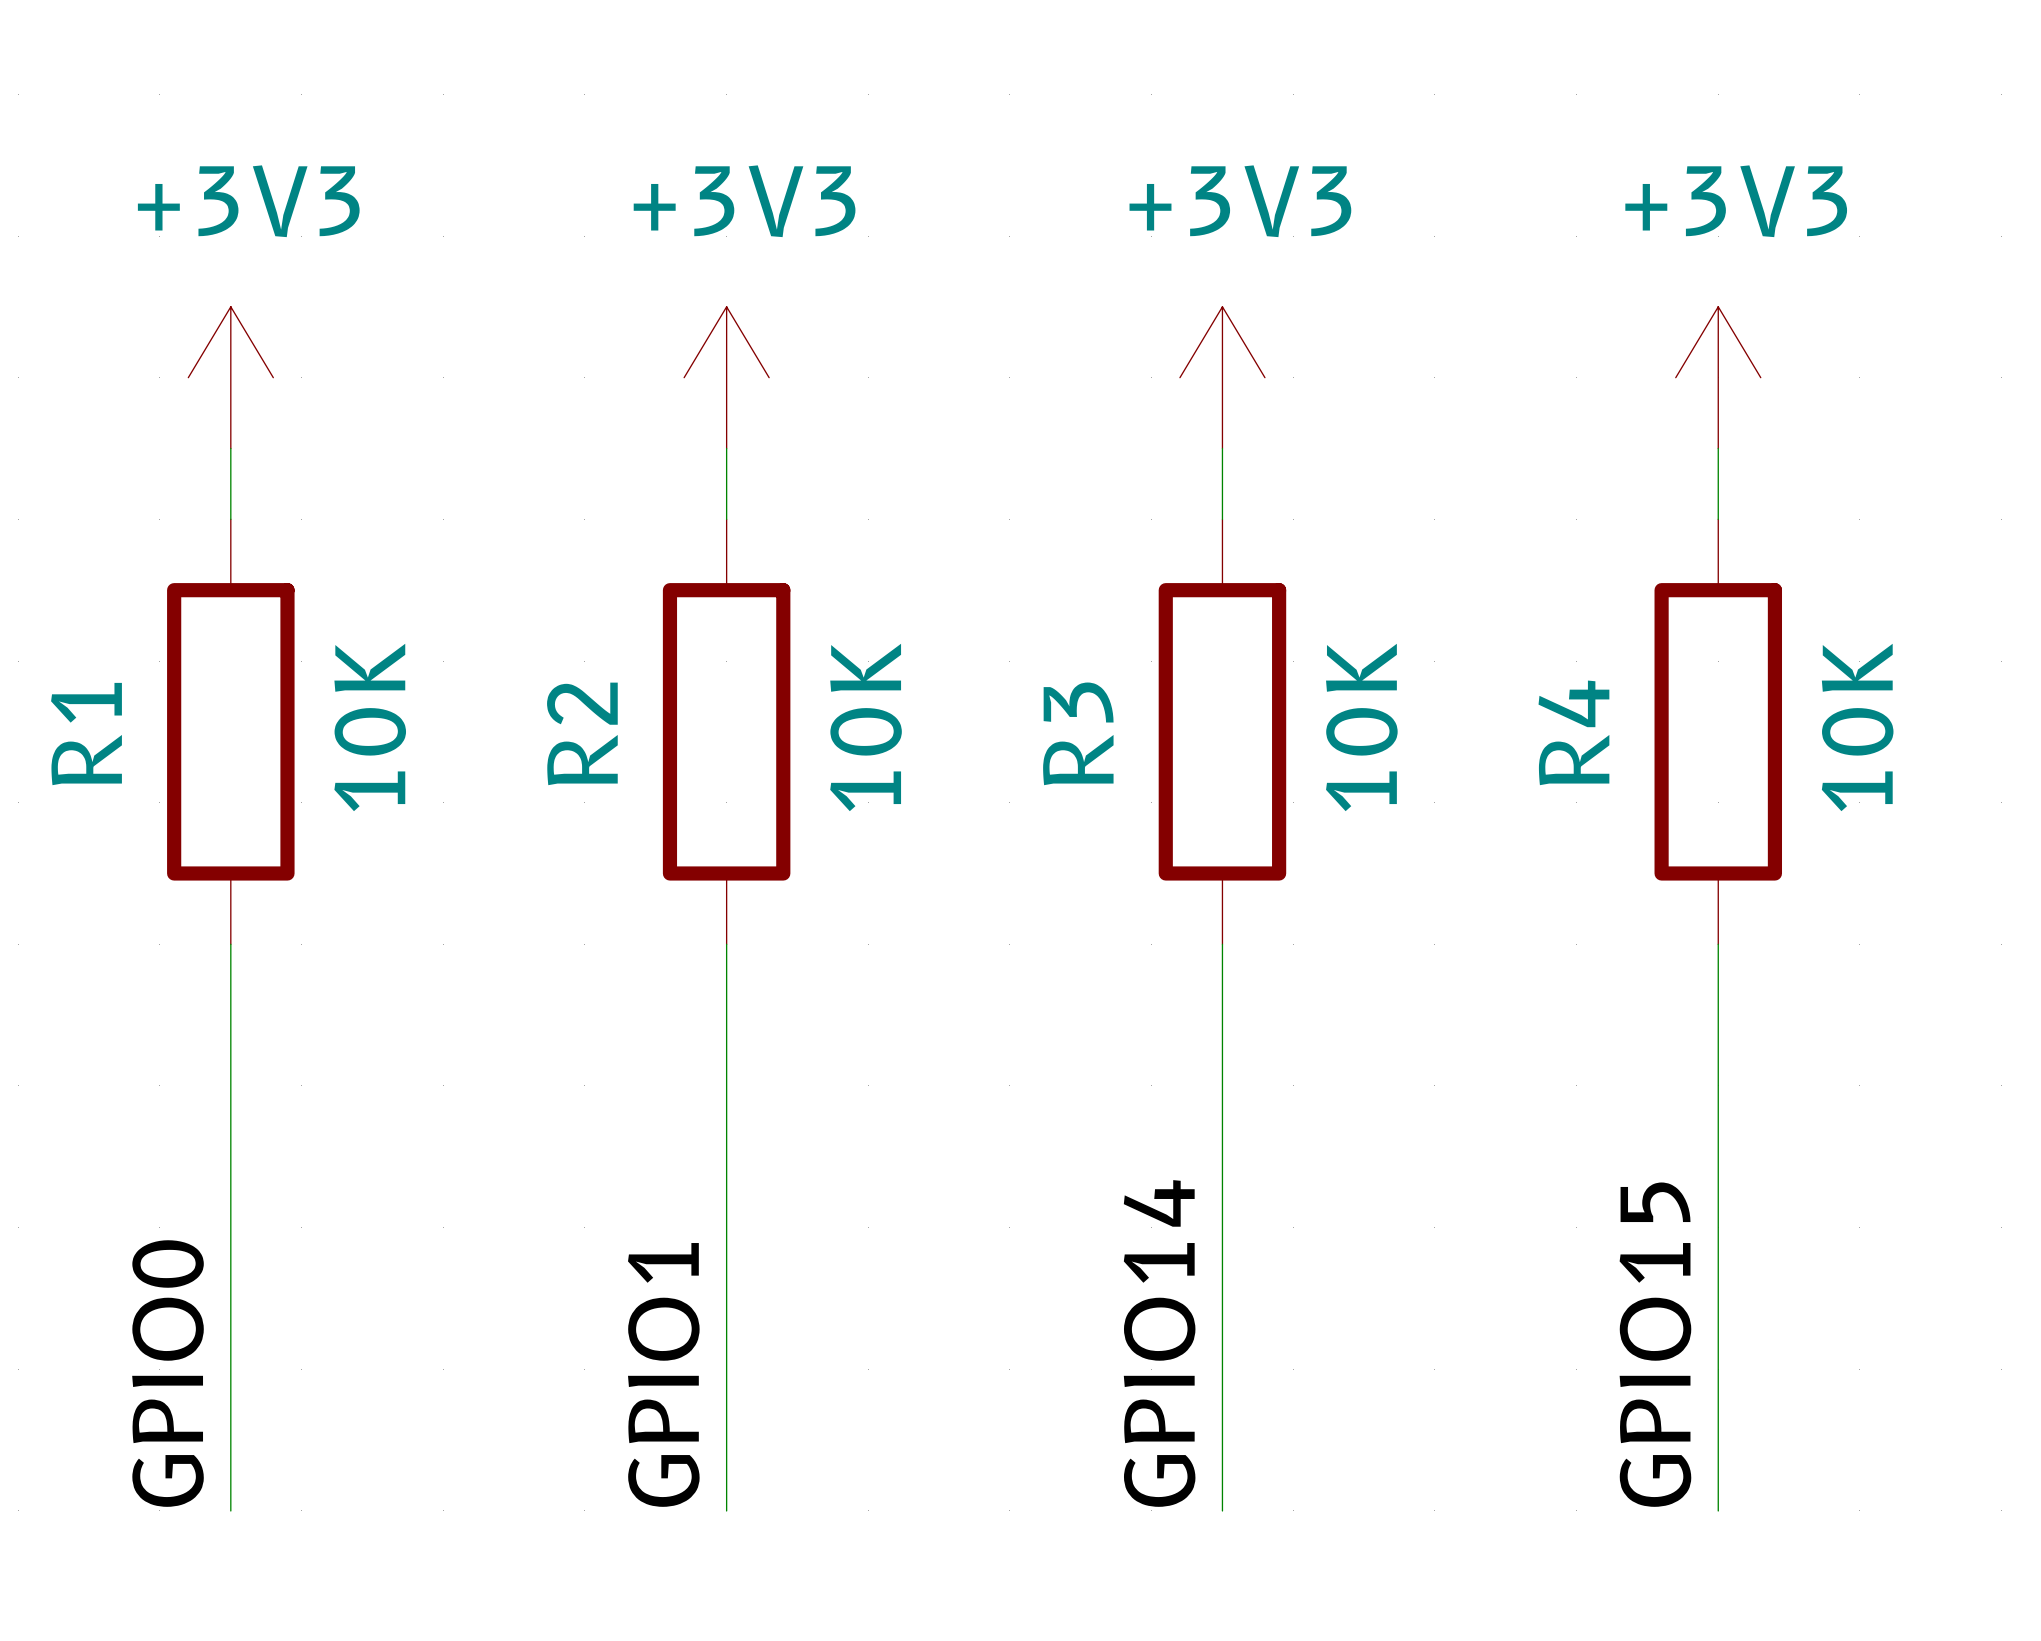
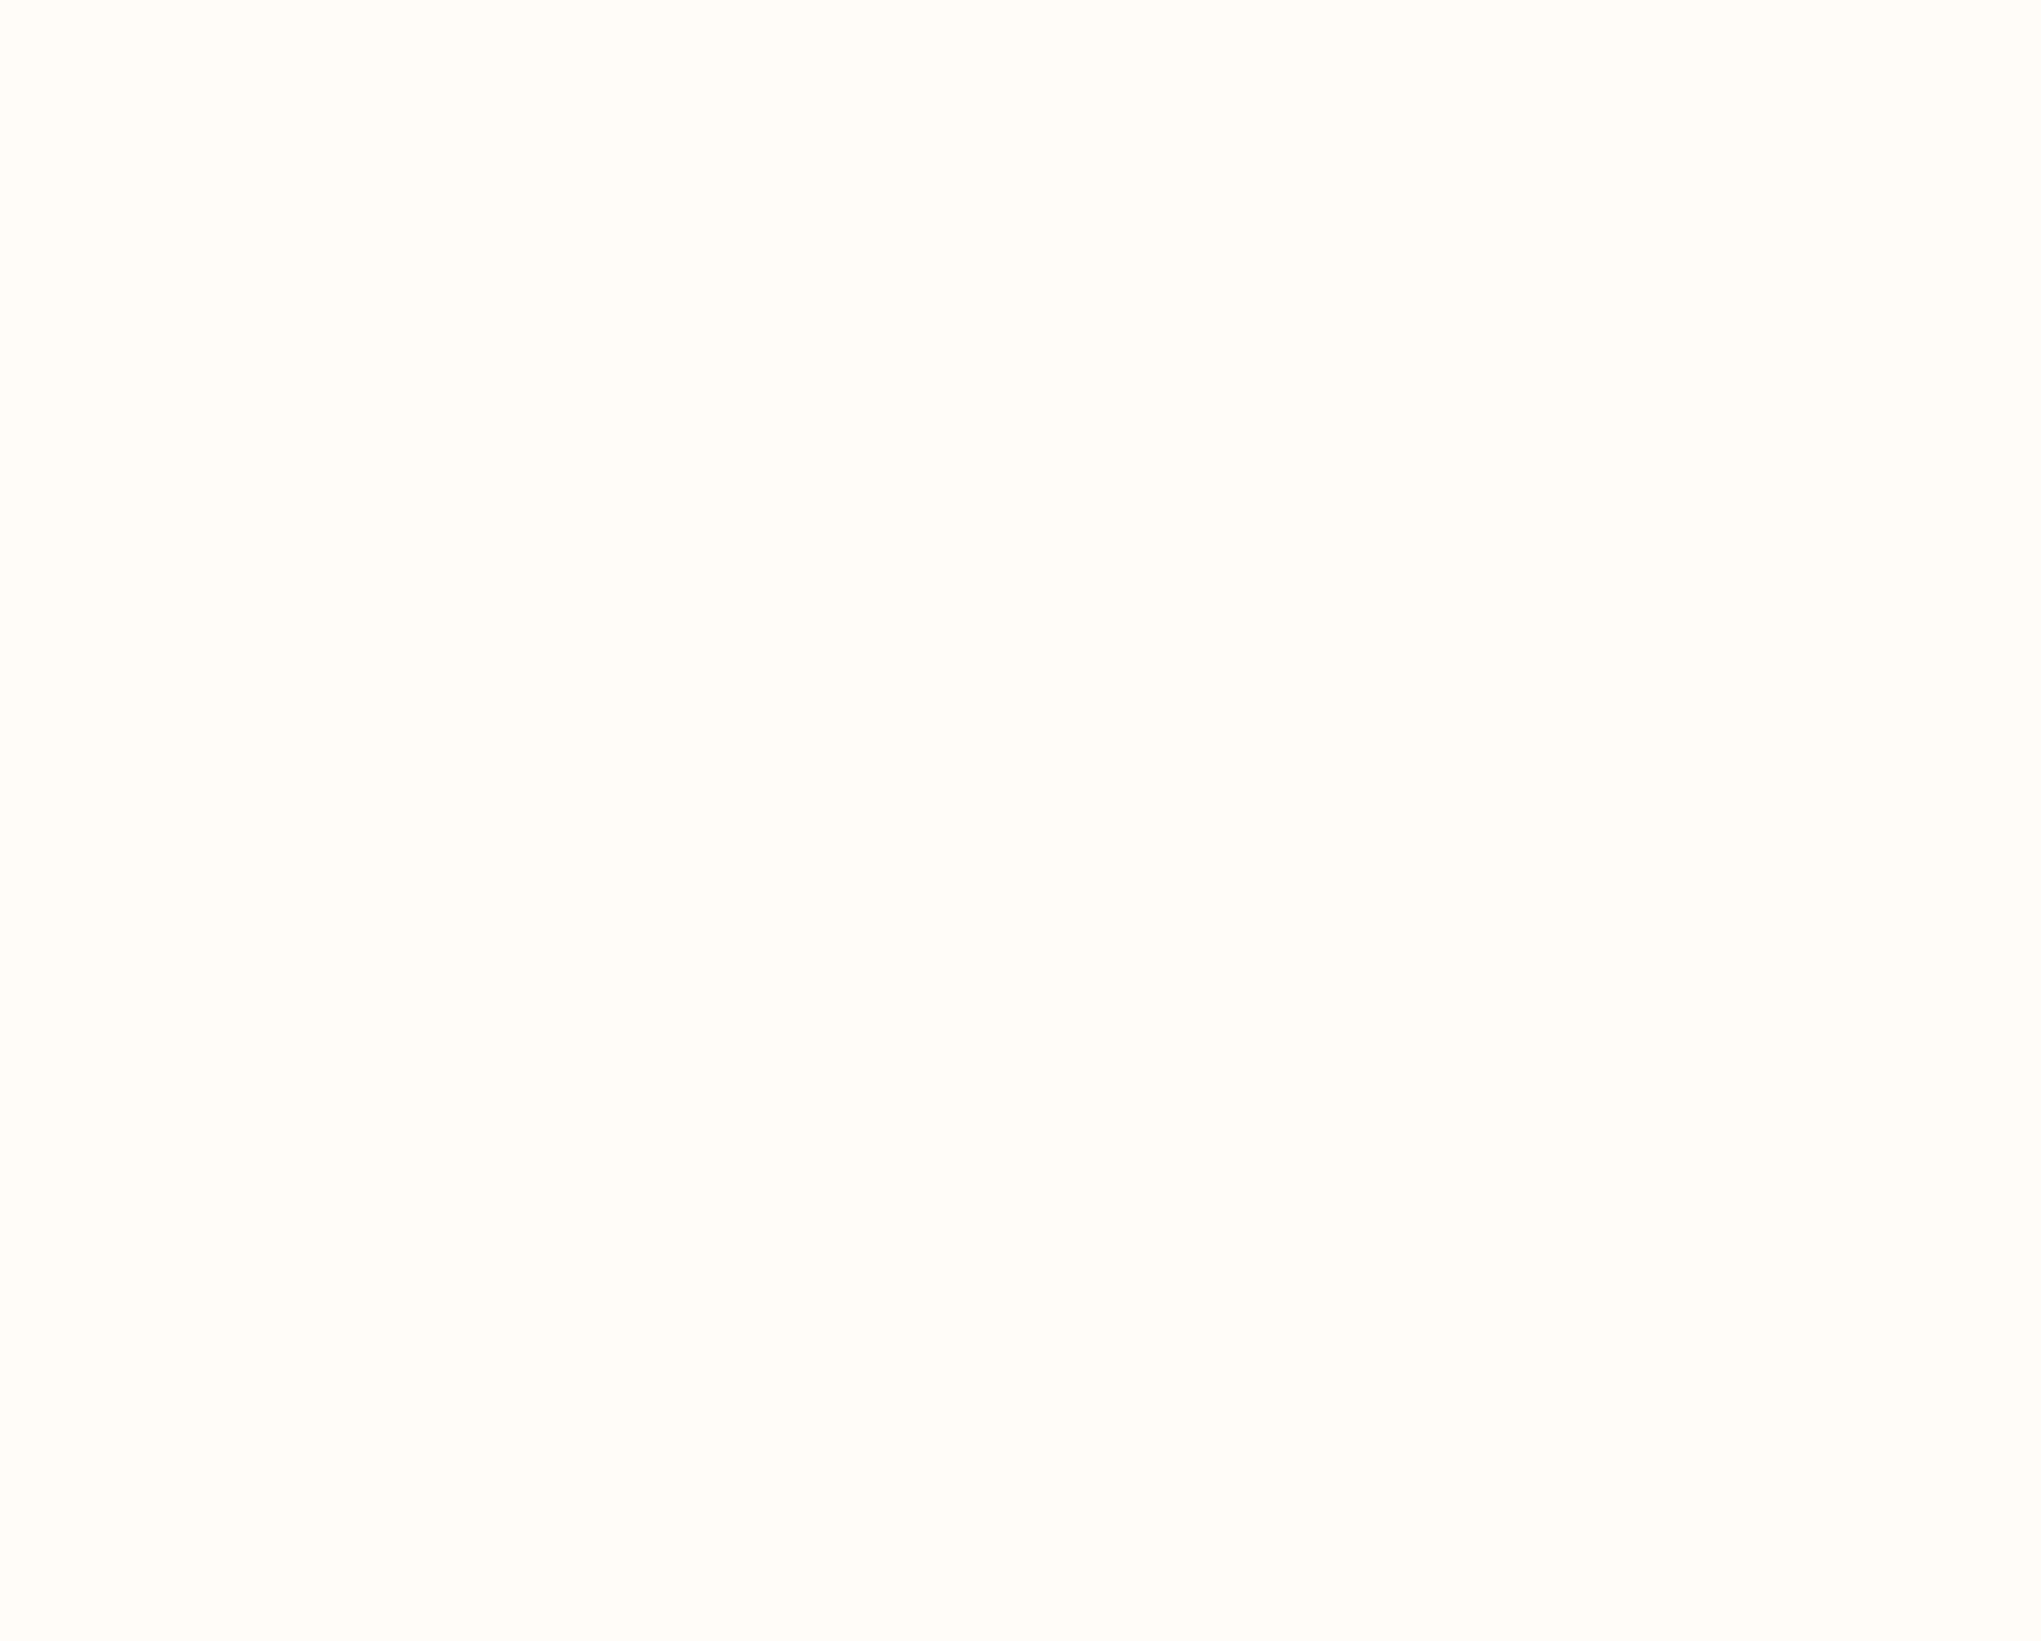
power symbol: +3V3 (230, 377) -> none
power symbol: +3V3 (726, 377) -> none
power symbol: +3V3 (1222, 377) -> none
power symbol: +3V3 (1718, 377) -> none
wire: (230, 448) (230, 519) -> none
wire: (726, 448) (726, 519) -> none
wire: (1222, 448) (1222, 519) -> none
wire: (1718, 448) (1718, 519) -> none
R1: 10K (230, 731) -> none
R2: 10K (726, 731) -> none
R3: 10K (1222, 731) -> none
R4: 10K (1718, 731) -> none
wire: (230, 944) (230, 1510) -> none
wire: (726, 944) (726, 1510) -> none
wire: (1222, 944) (1222, 1510) -> none
wire: (1718, 944) (1718, 1510) -> none
label: GPIO14 (1159, 1343) -> none
label: GPIO15 (1655, 1344) -> none
label: GPIO0 (168, 1373) -> none
label: GPIO1 (663, 1374) -> none

